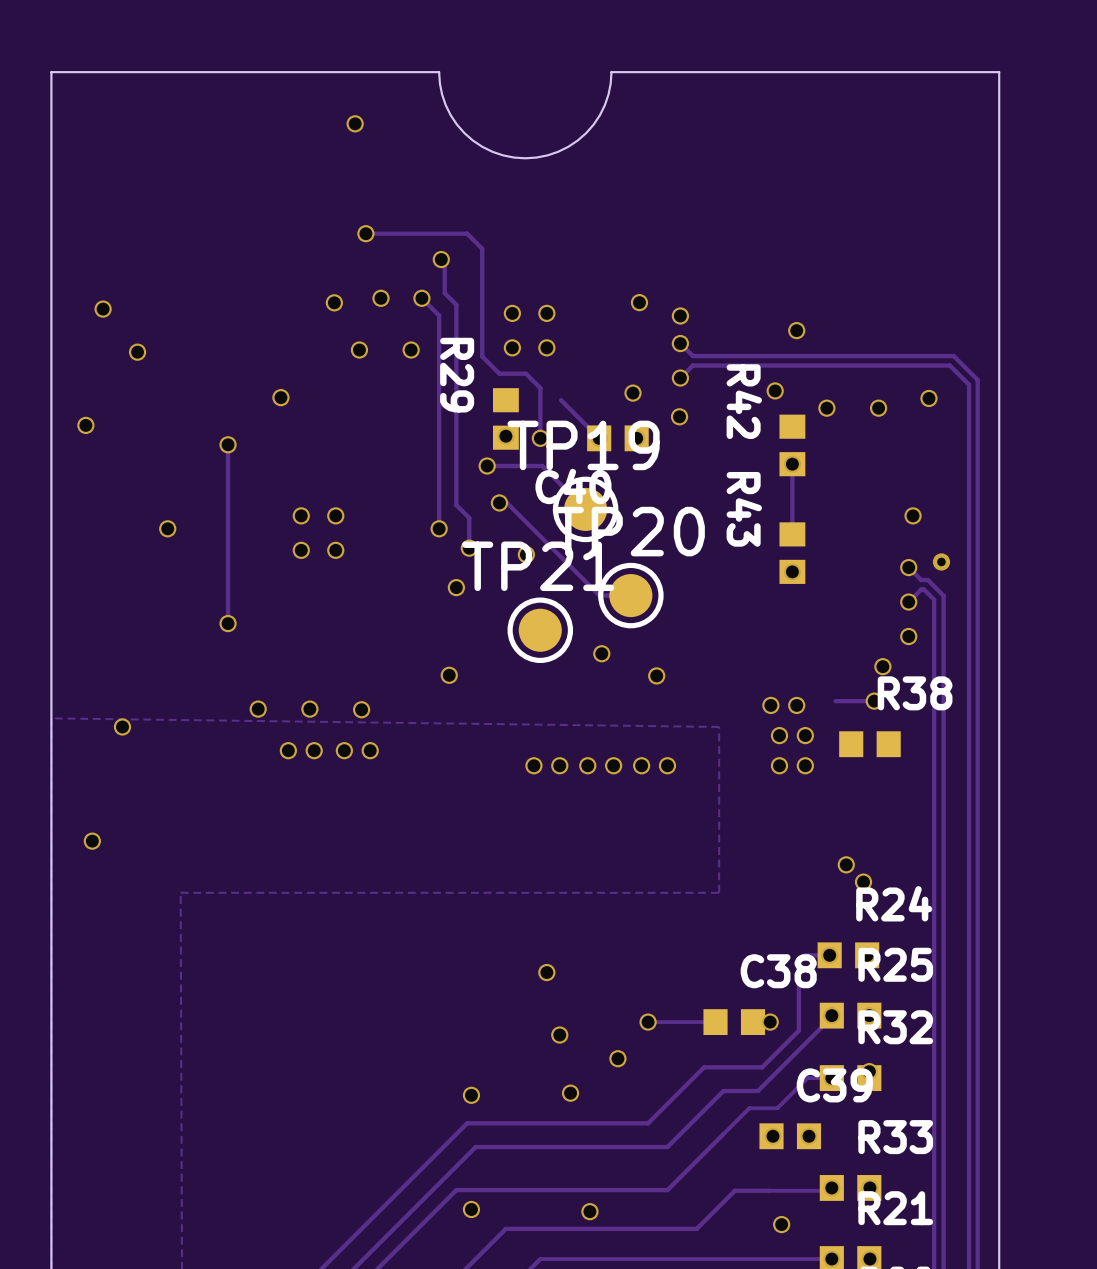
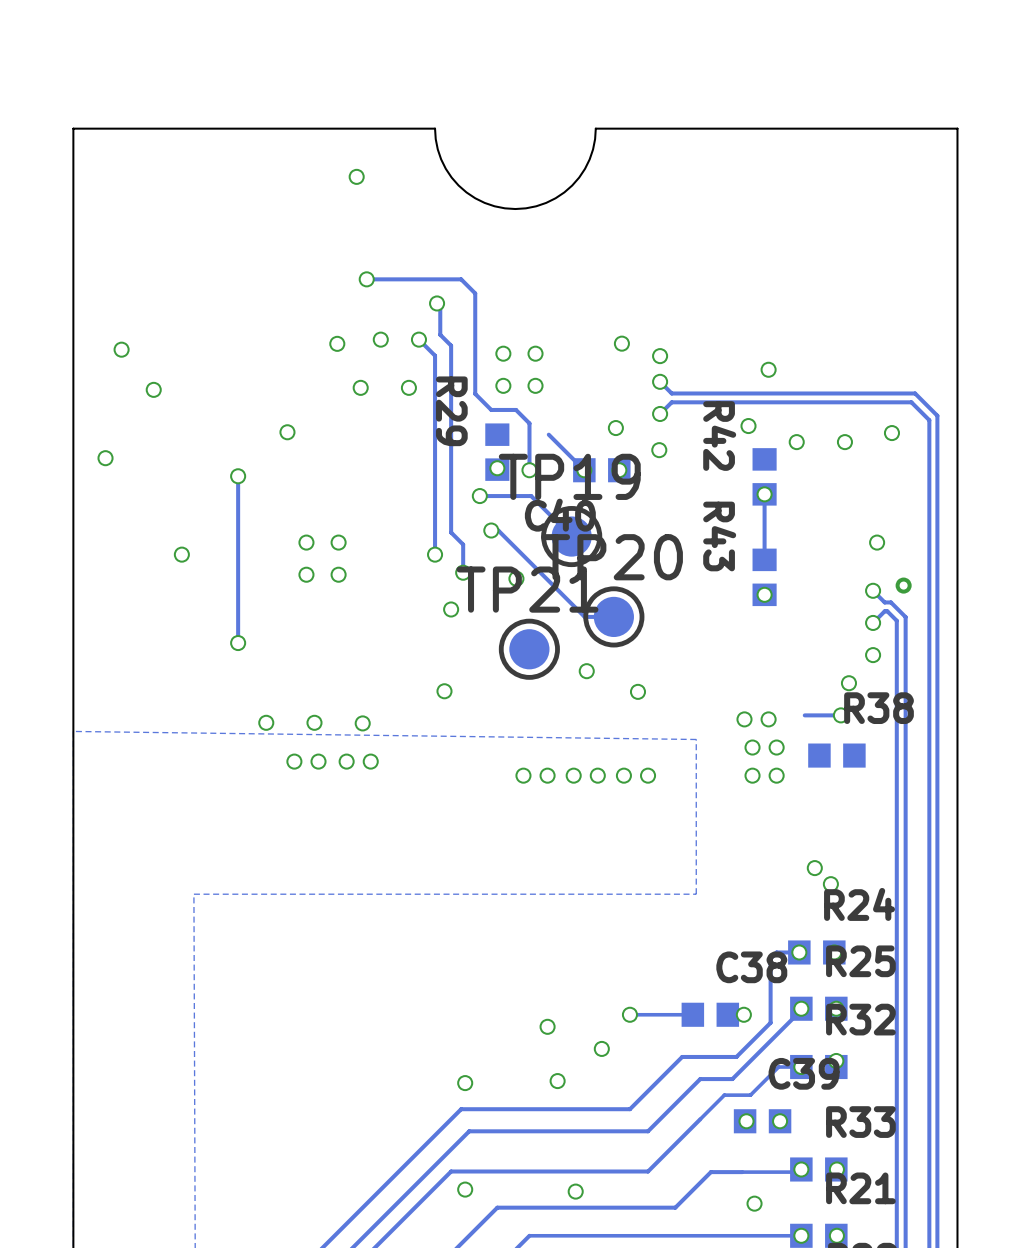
via: (122, 726) -> none
via: (92, 841) -> none
via: (546, 972) -> none

